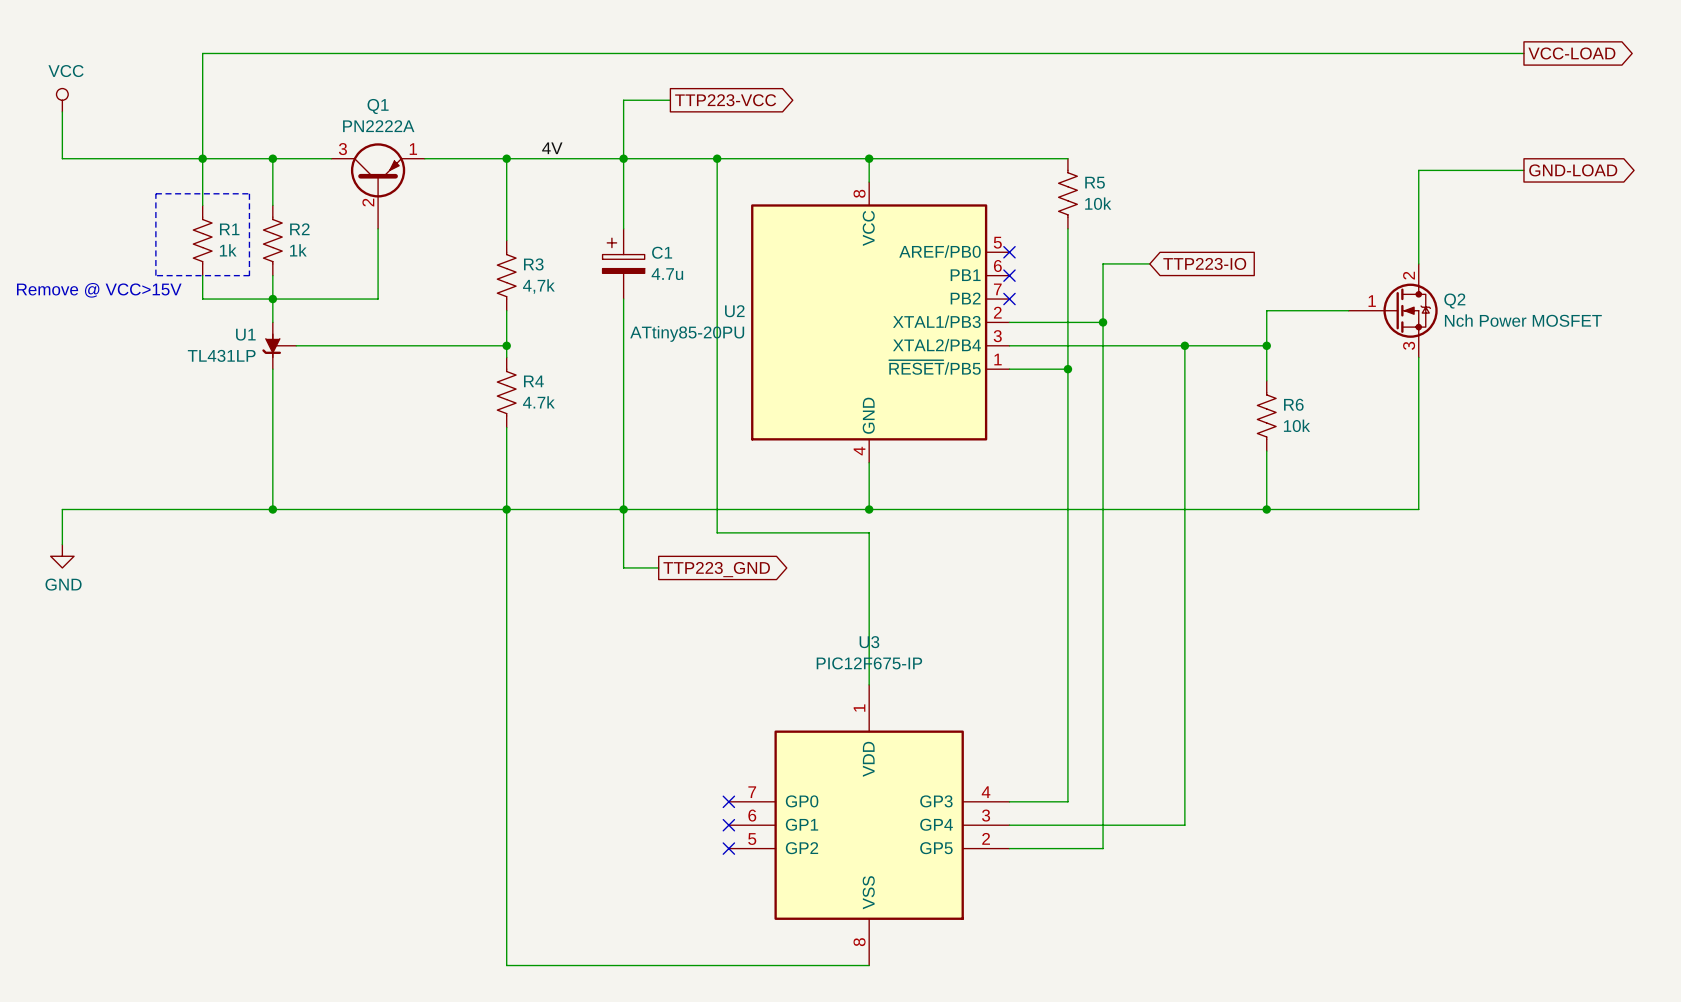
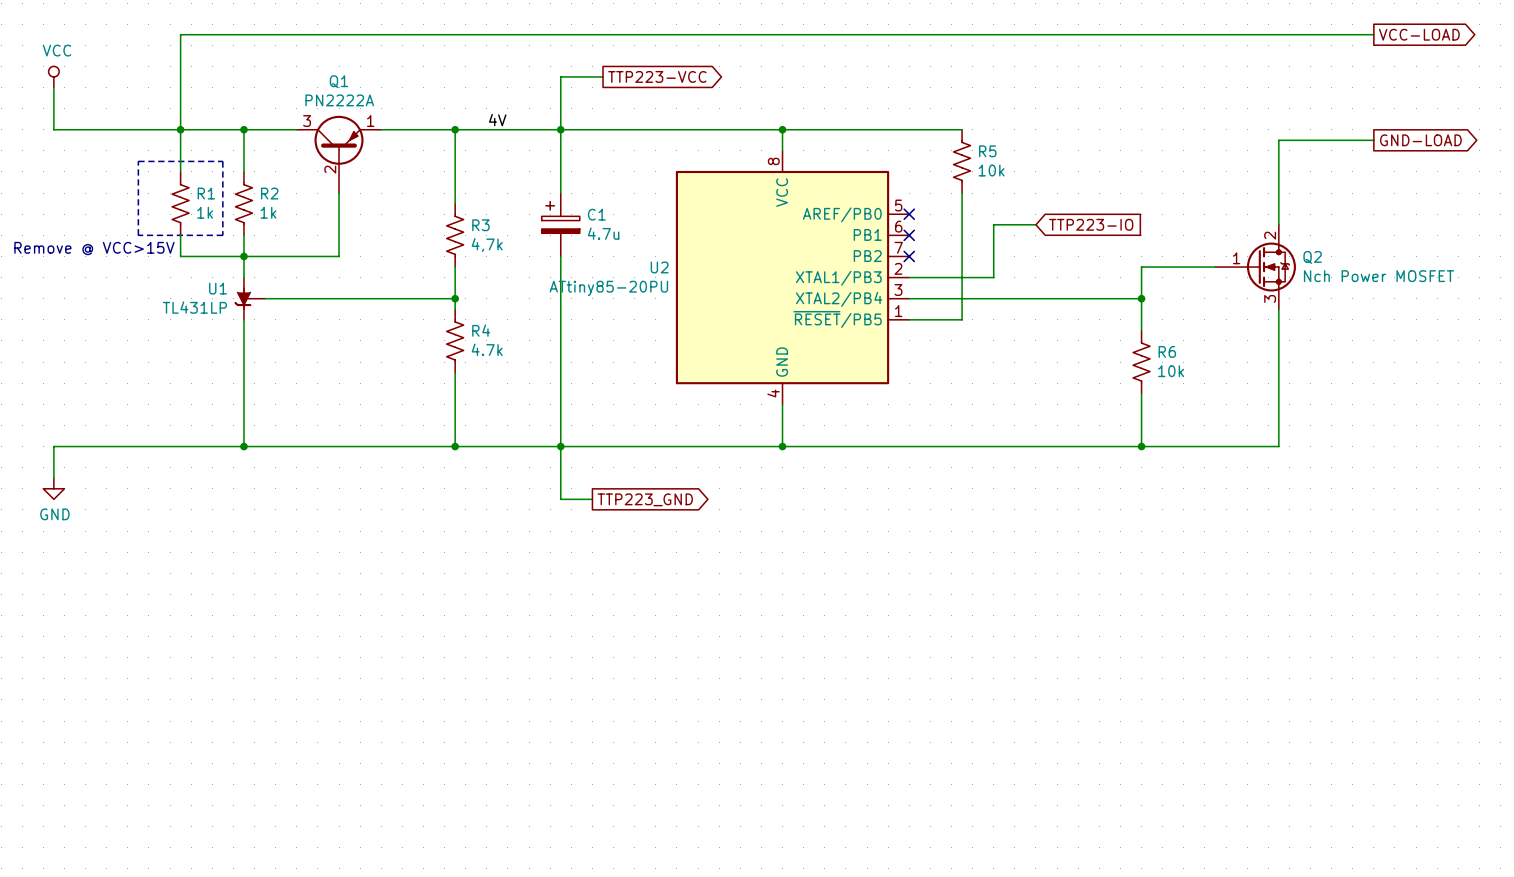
wire: (717, 158) (717, 532) (869, 532) (869, 684) -> none
junction: (717, 158) -> none
wire: (1103, 322) (1103, 848) (1009, 848) -> none
junction: (1103, 322) -> none
wire: (1184, 345) (1184, 825) (1009, 825) -> none
junction: (1184, 345) -> none
wire: (1067, 369) (1067, 801) (1009, 801) -> none
junction: (1067, 369) -> none
wire: (506, 509) (506, 965) (869, 965) -> none
no-connect mark: (728, 801) -> none
no-connect mark: (728, 825) -> none
U3: PIC12F675-IP (869, 825) -> none
no-connect mark: (728, 848) -> none

